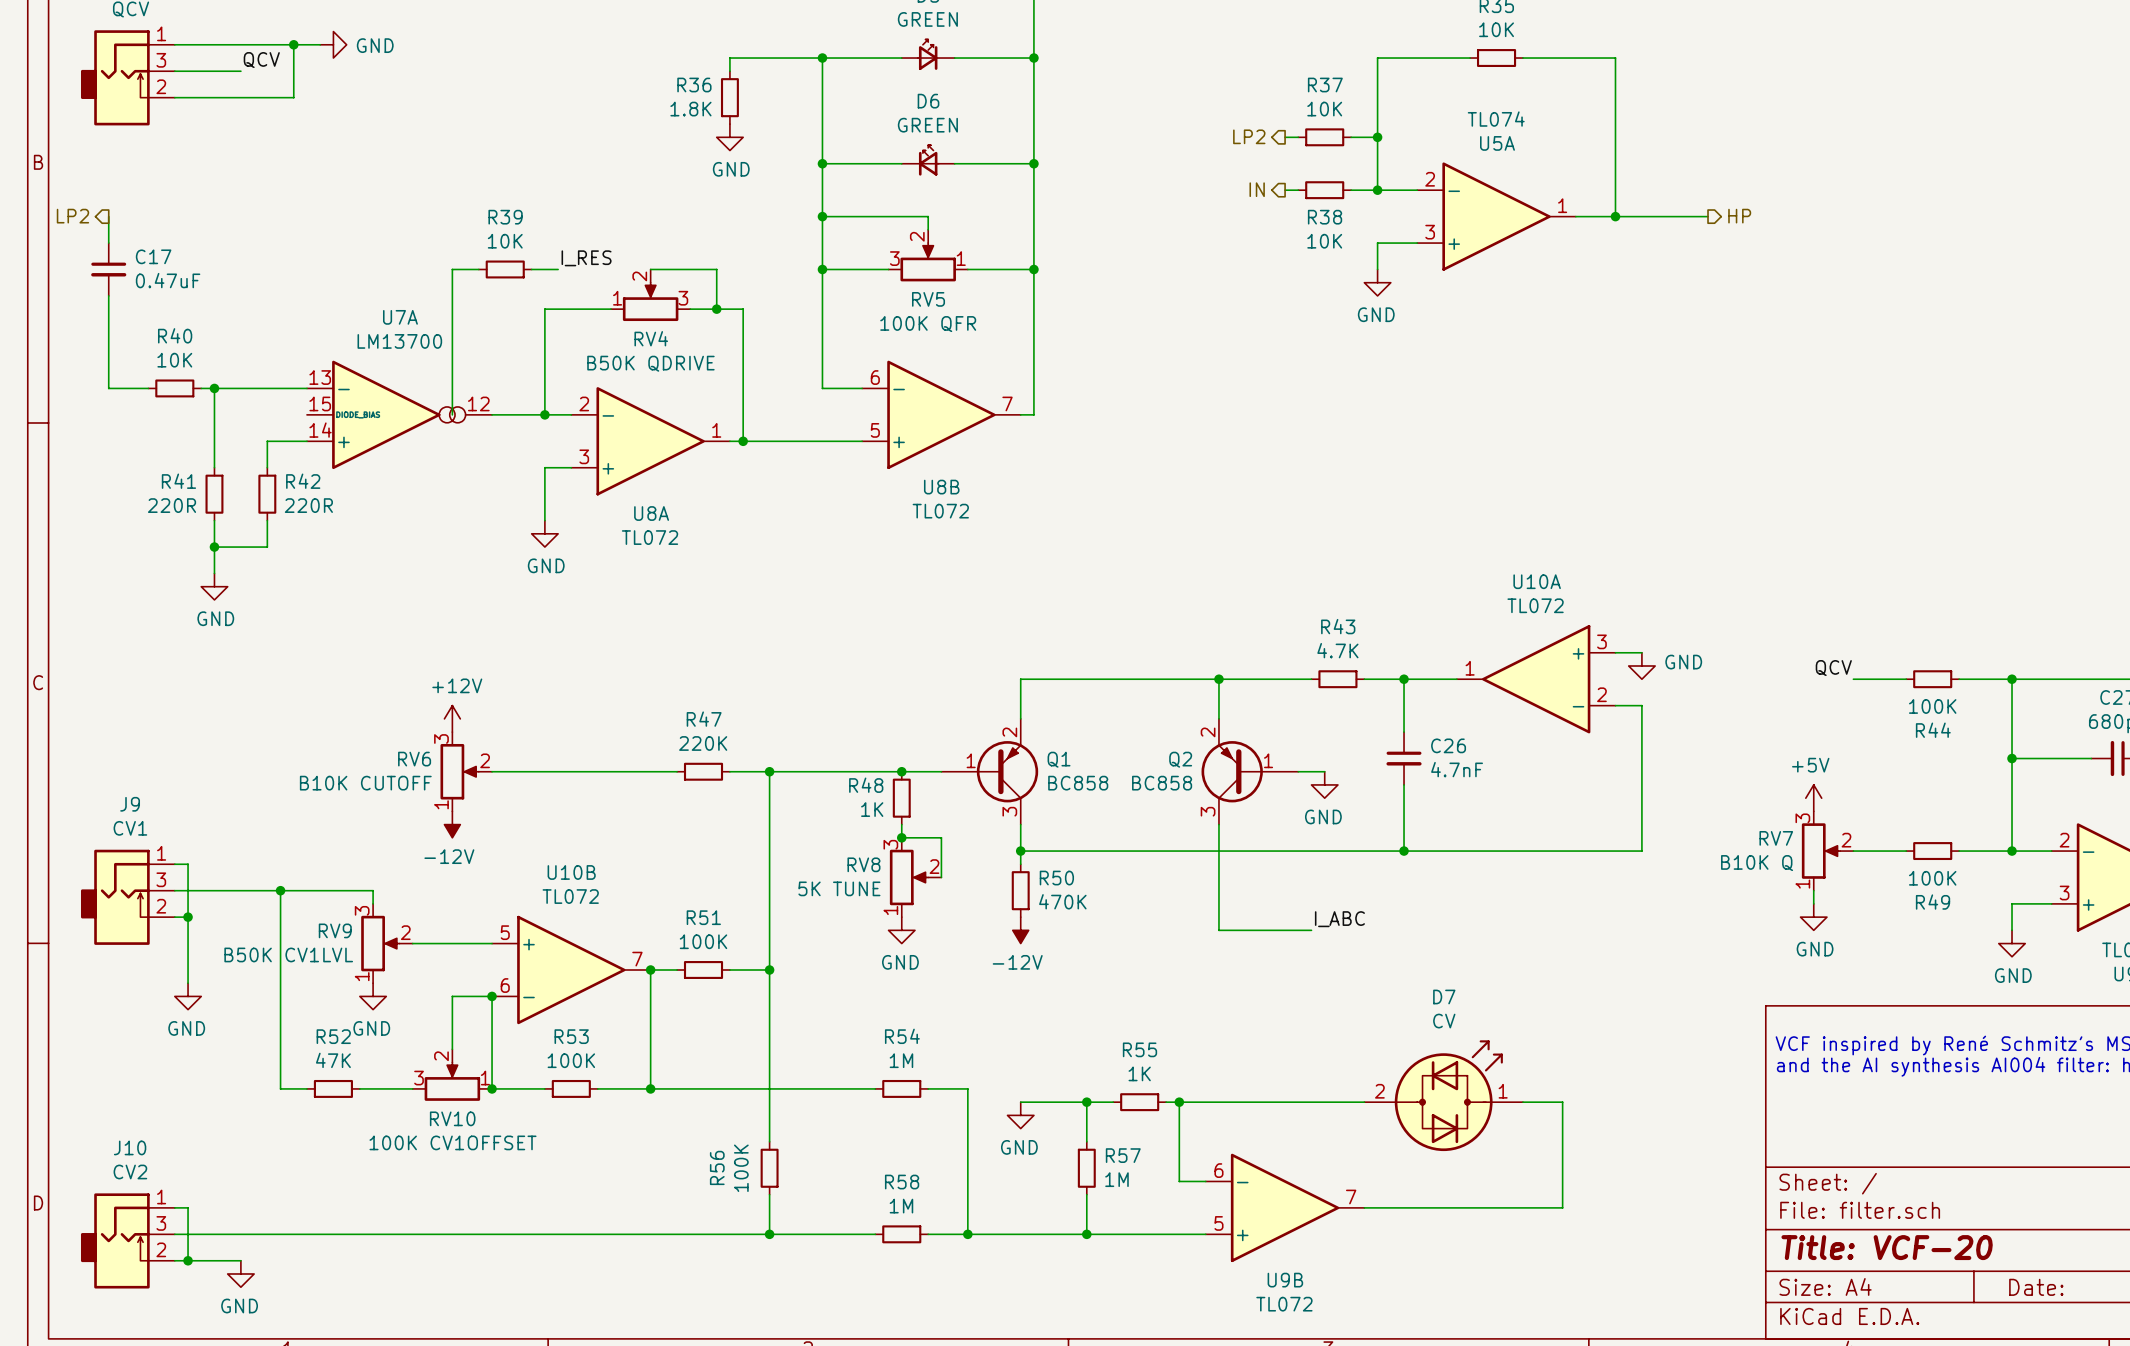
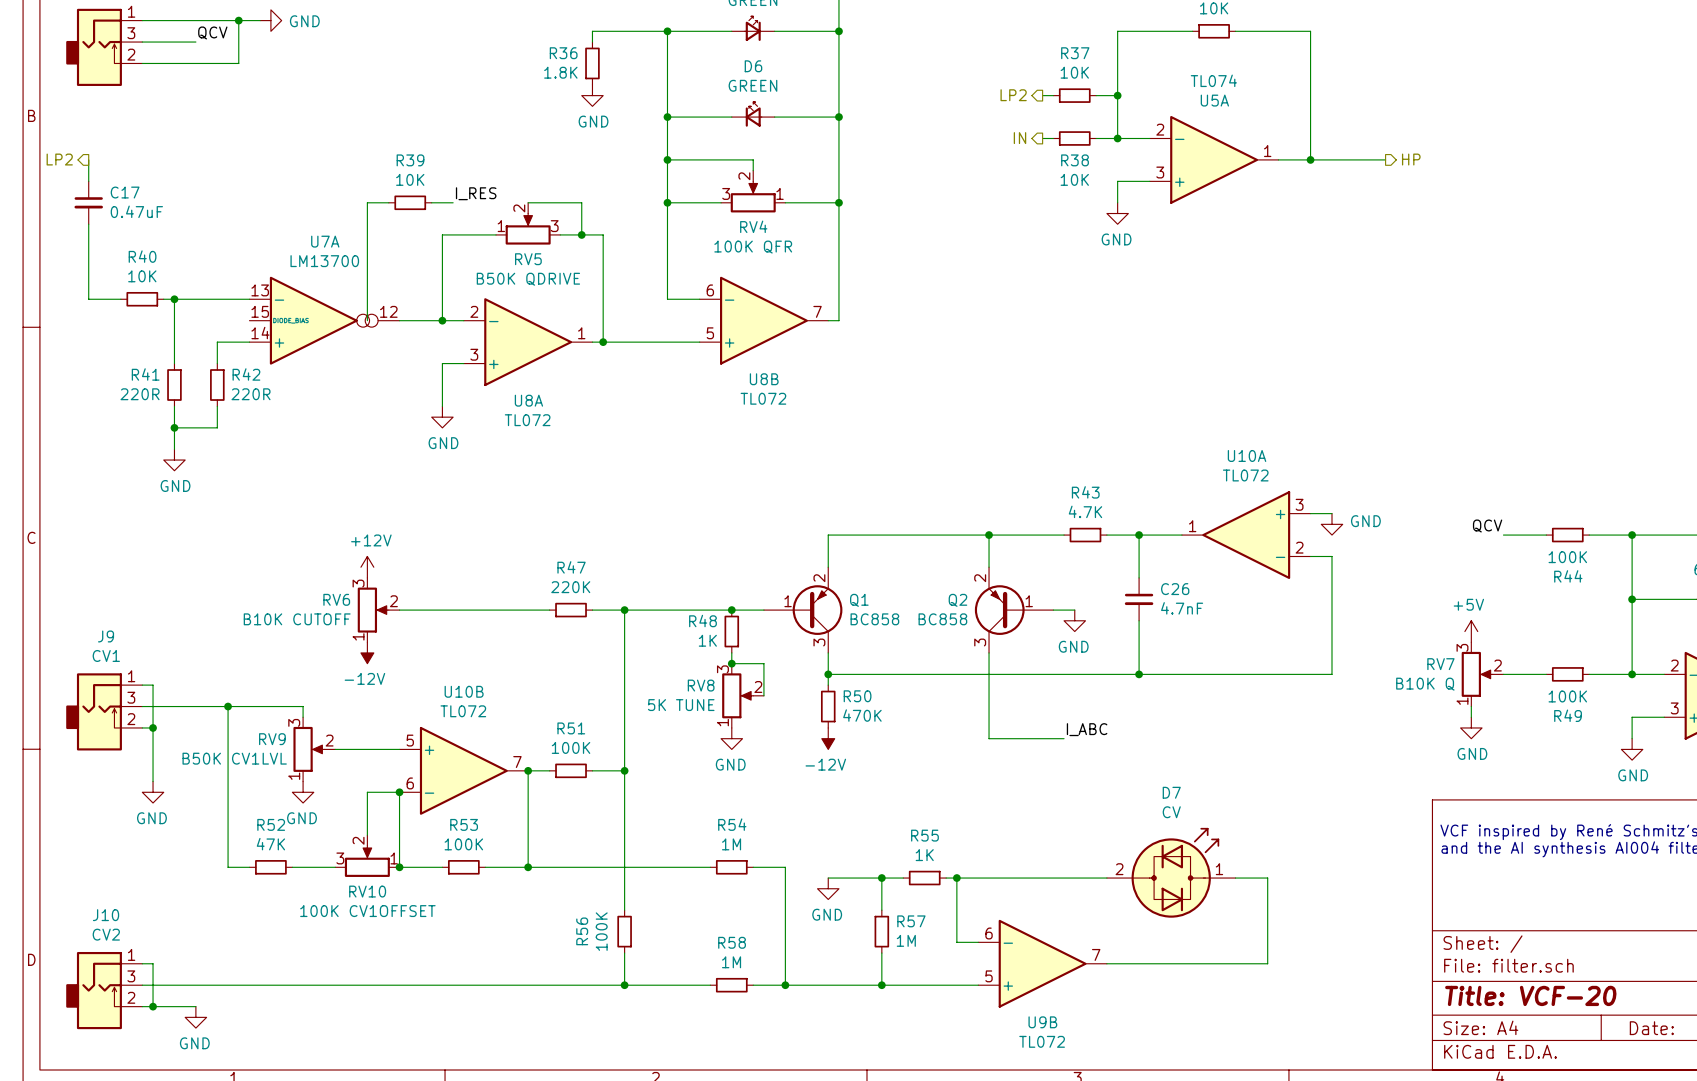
RV5 name: RV5 (928, 299) -> RV4 (753, 226)
RV4 name: RV4 (651, 338) -> RV5 (528, 259)

